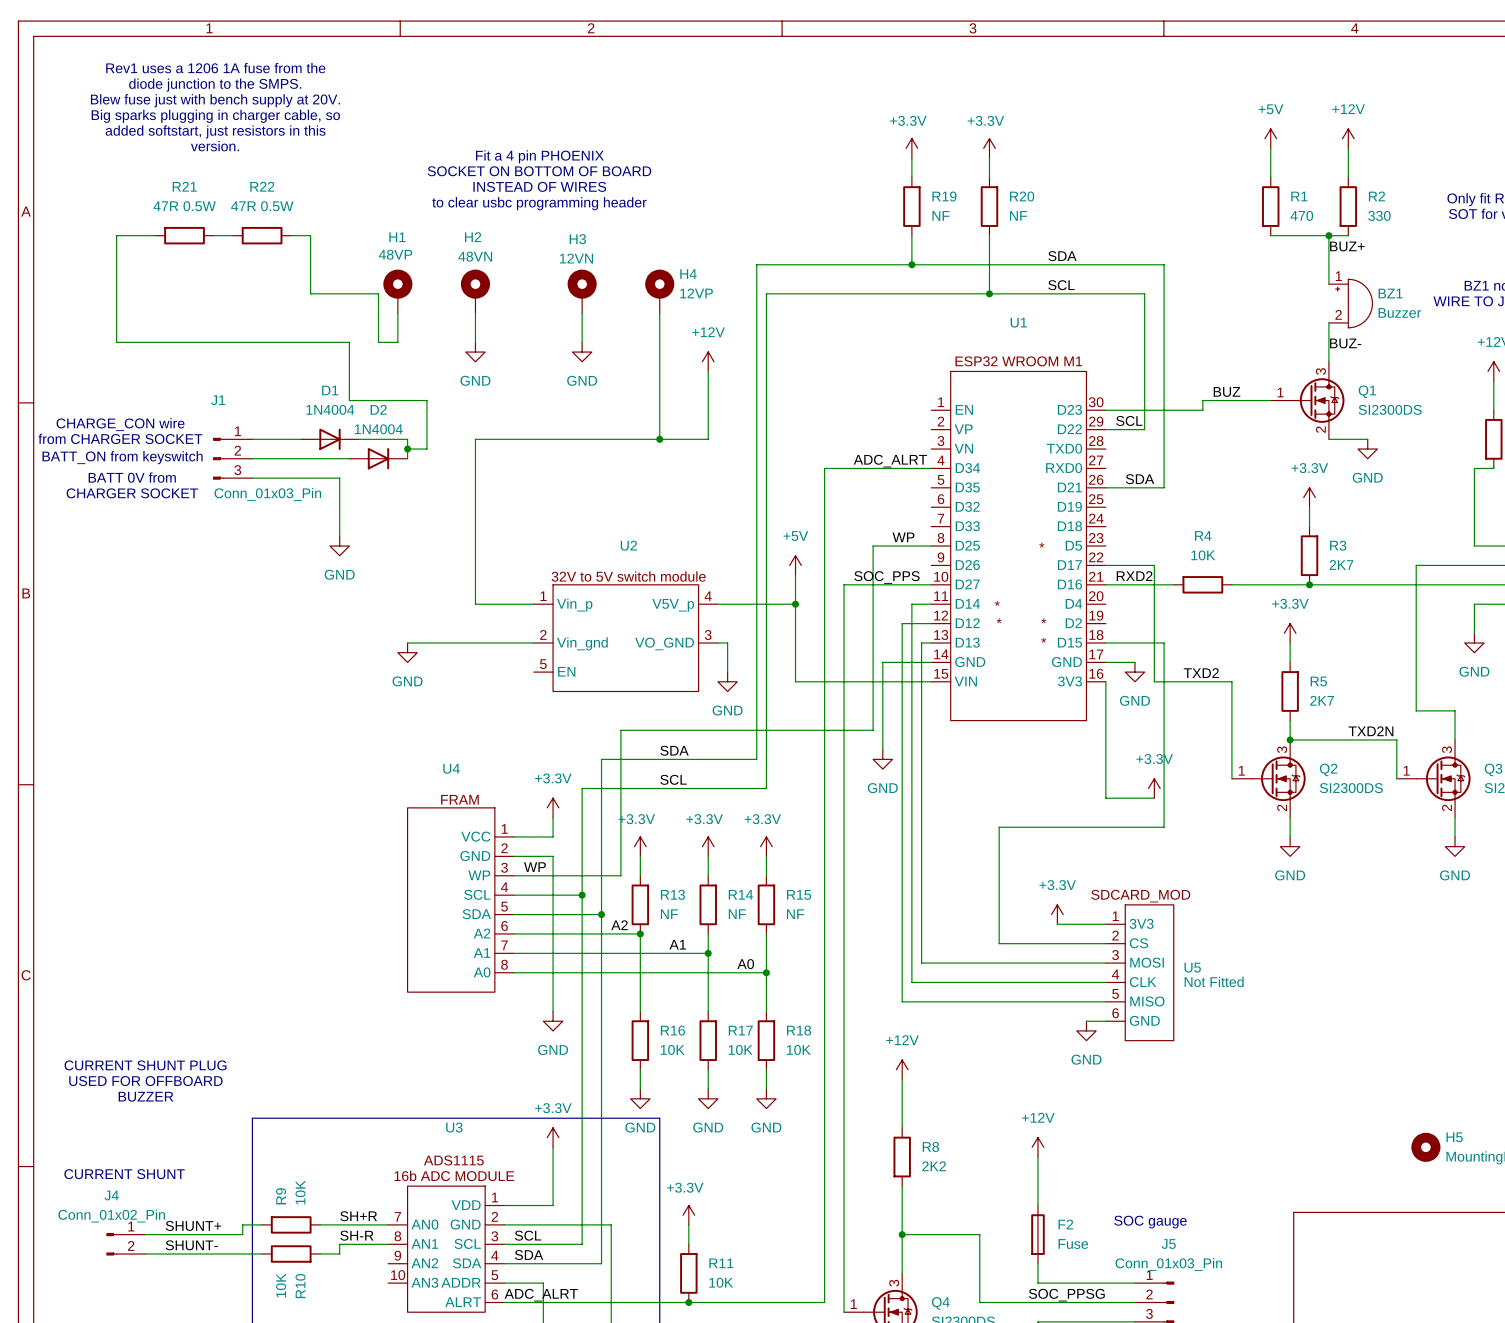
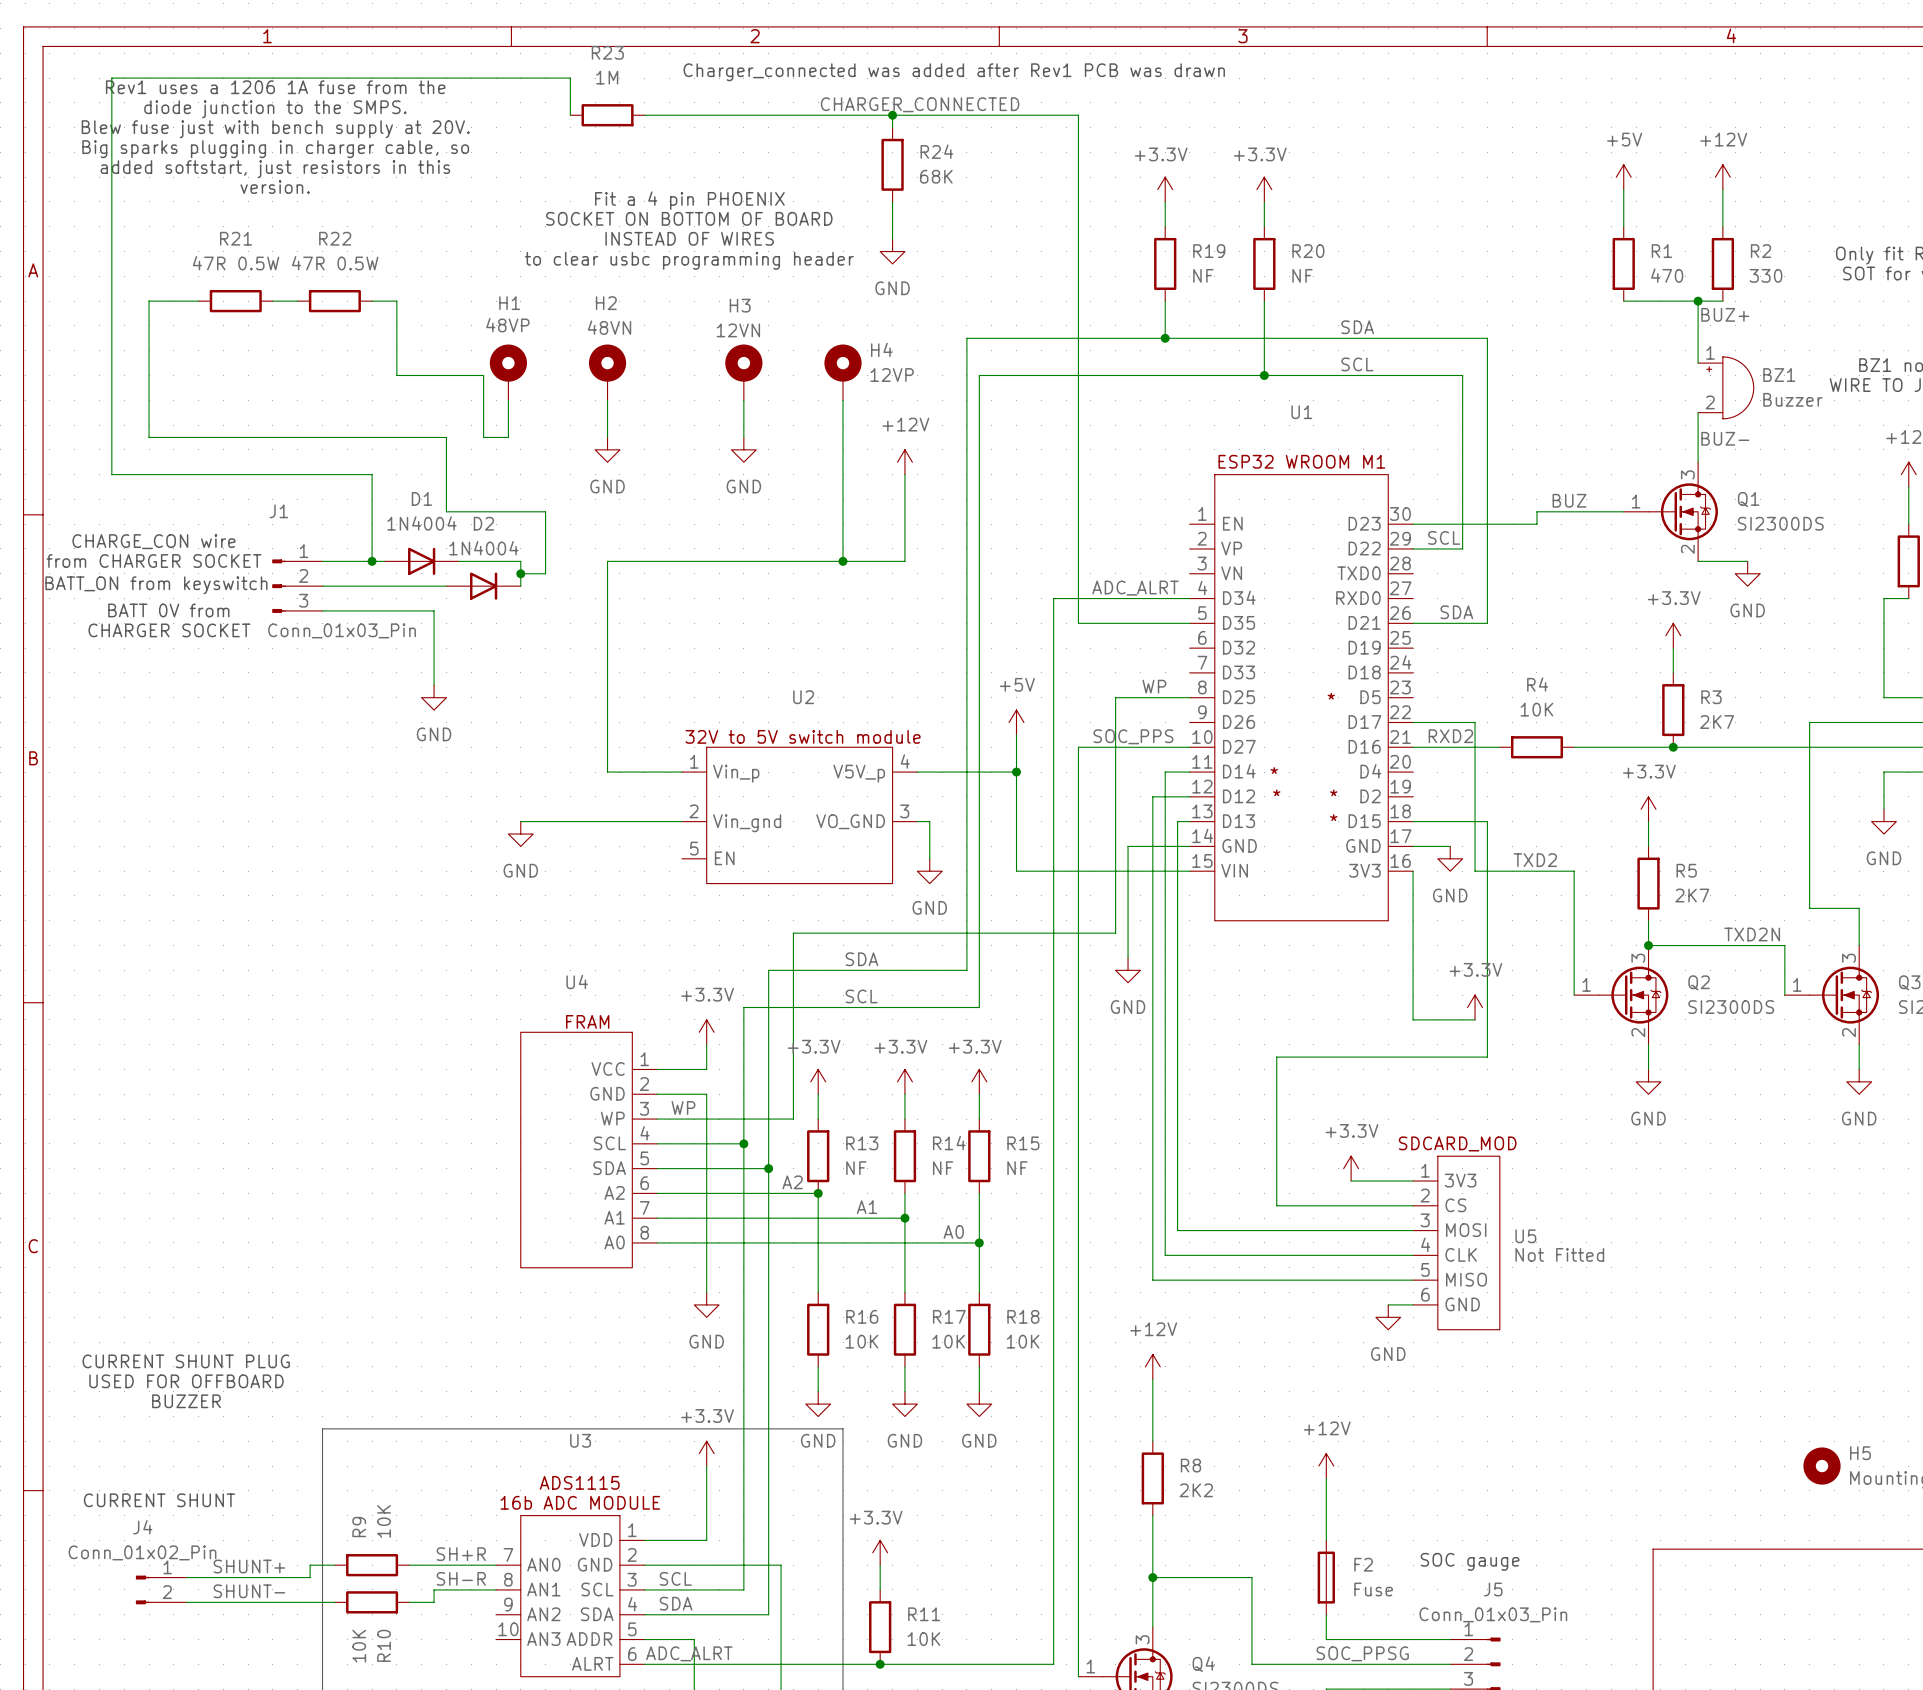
text: none -> Charger_connected was added after Rev1 PCB was drawn (954, 72)
label: none -> CHARGER_CONNECTED (920, 104)
wire: none -> (570, 115) (570, 78) (111, 78) (111, 474) (372, 474) (372, 561)
R23: none -> 1M (607, 115)
wire: none -> (644, 115) (1078, 115) (1078, 623) (1189, 623)
wire: none -> (892, 115) (892, 127)
junction: none -> (892, 115)
R24: none -> 68K (892, 164)
wire: none -> (892, 201) (892, 239)
power symbol: none -> GND (892, 251)
junction: none -> (372, 561)

